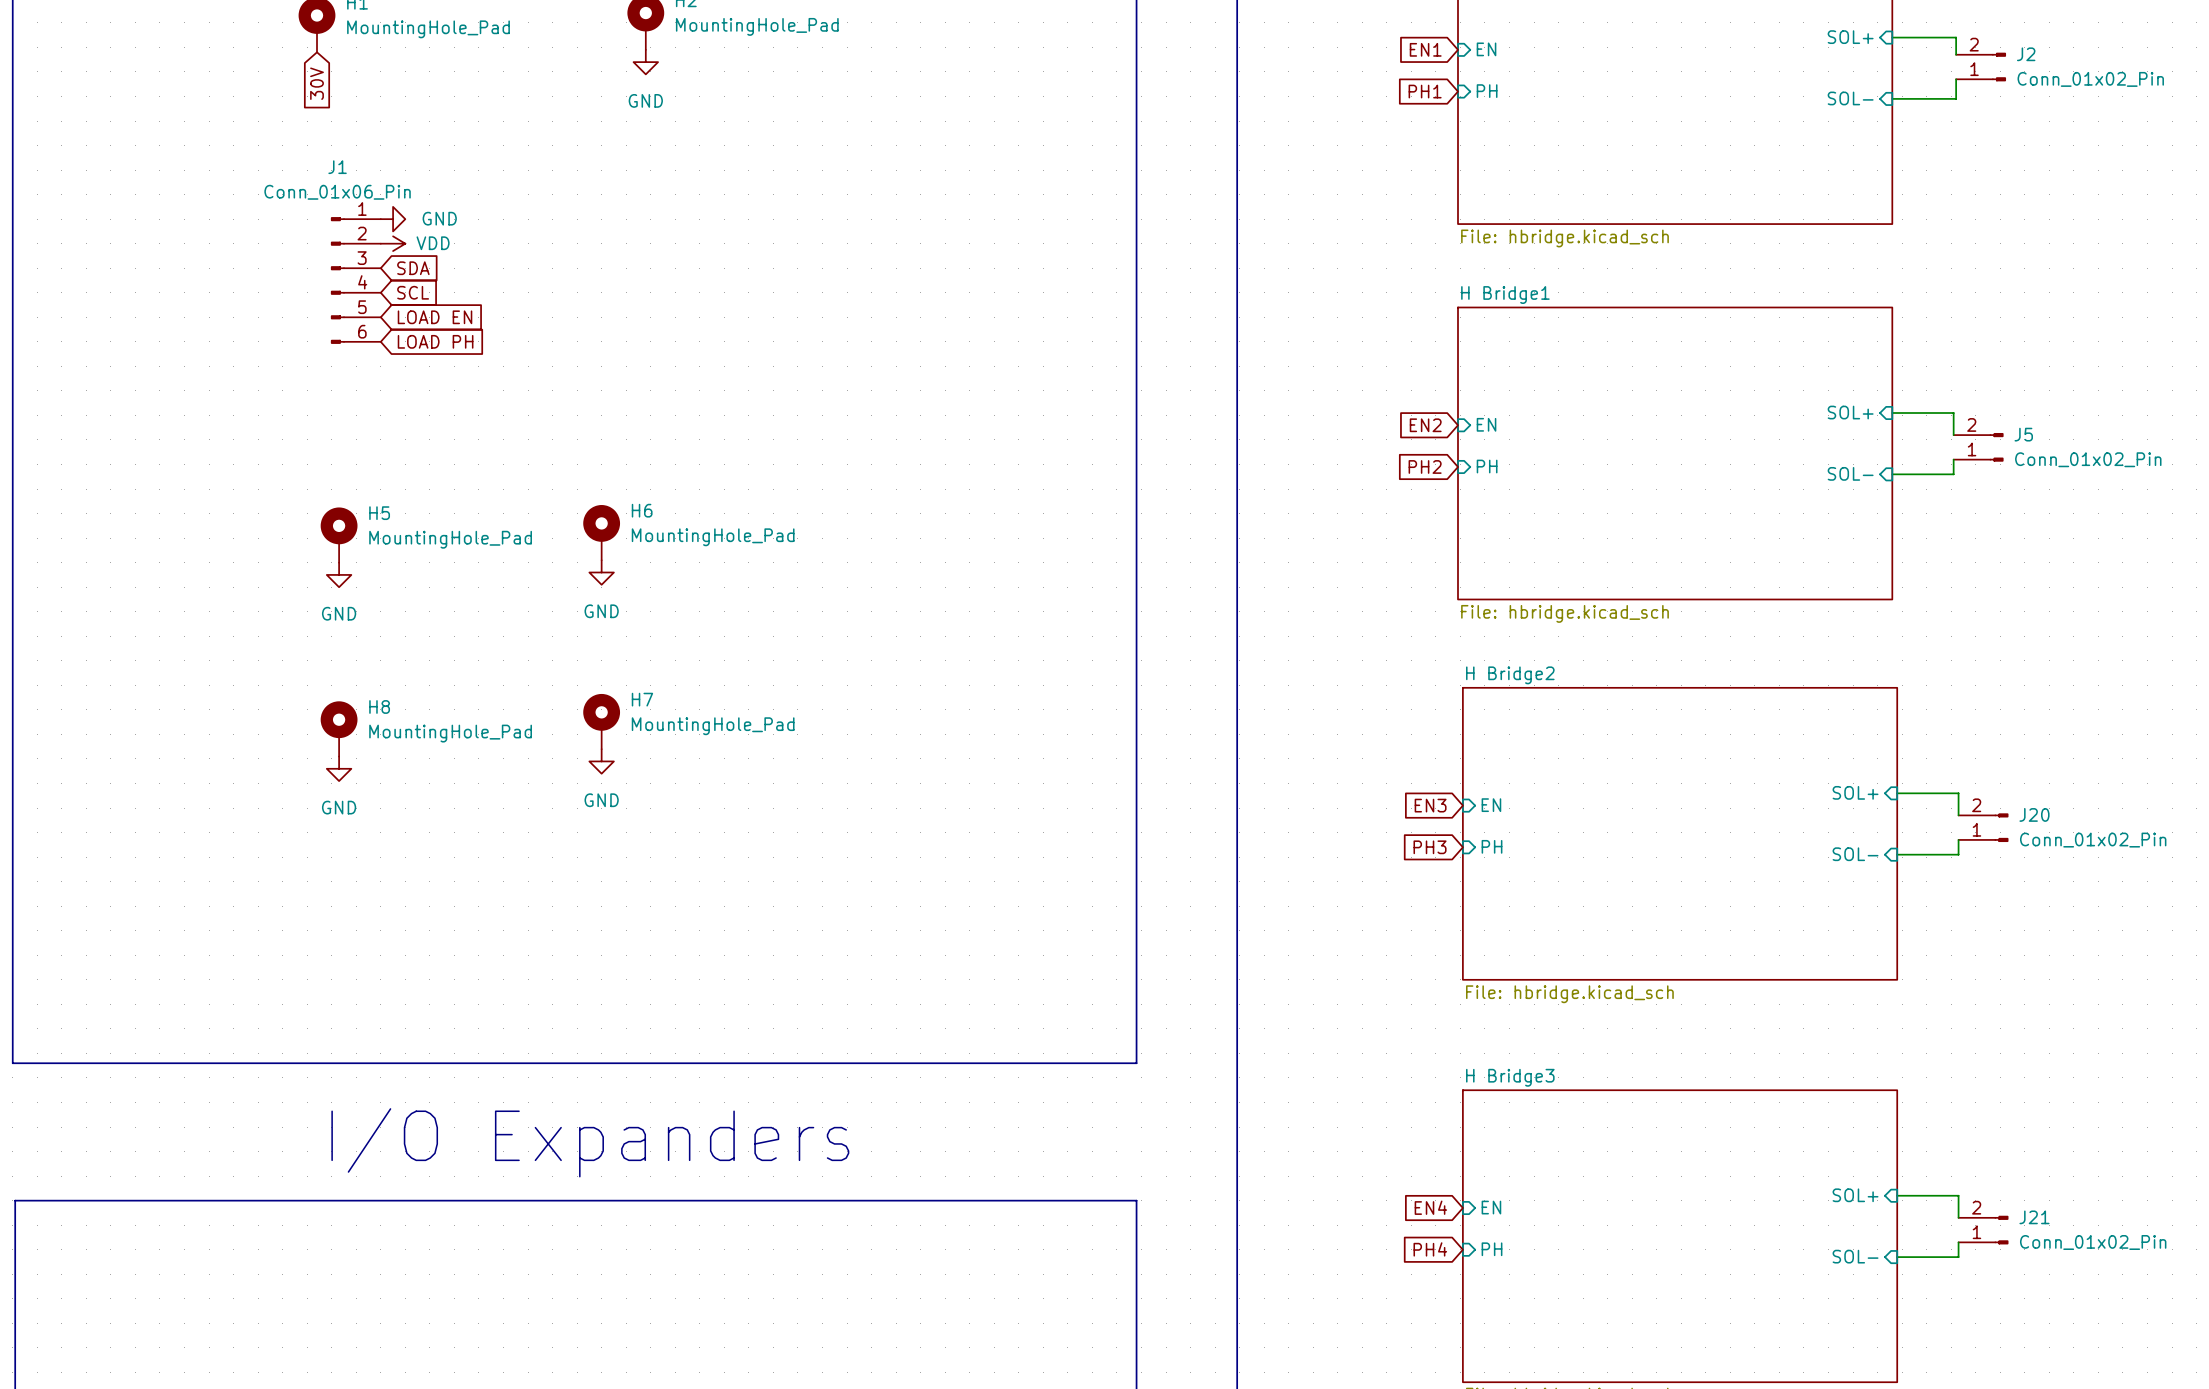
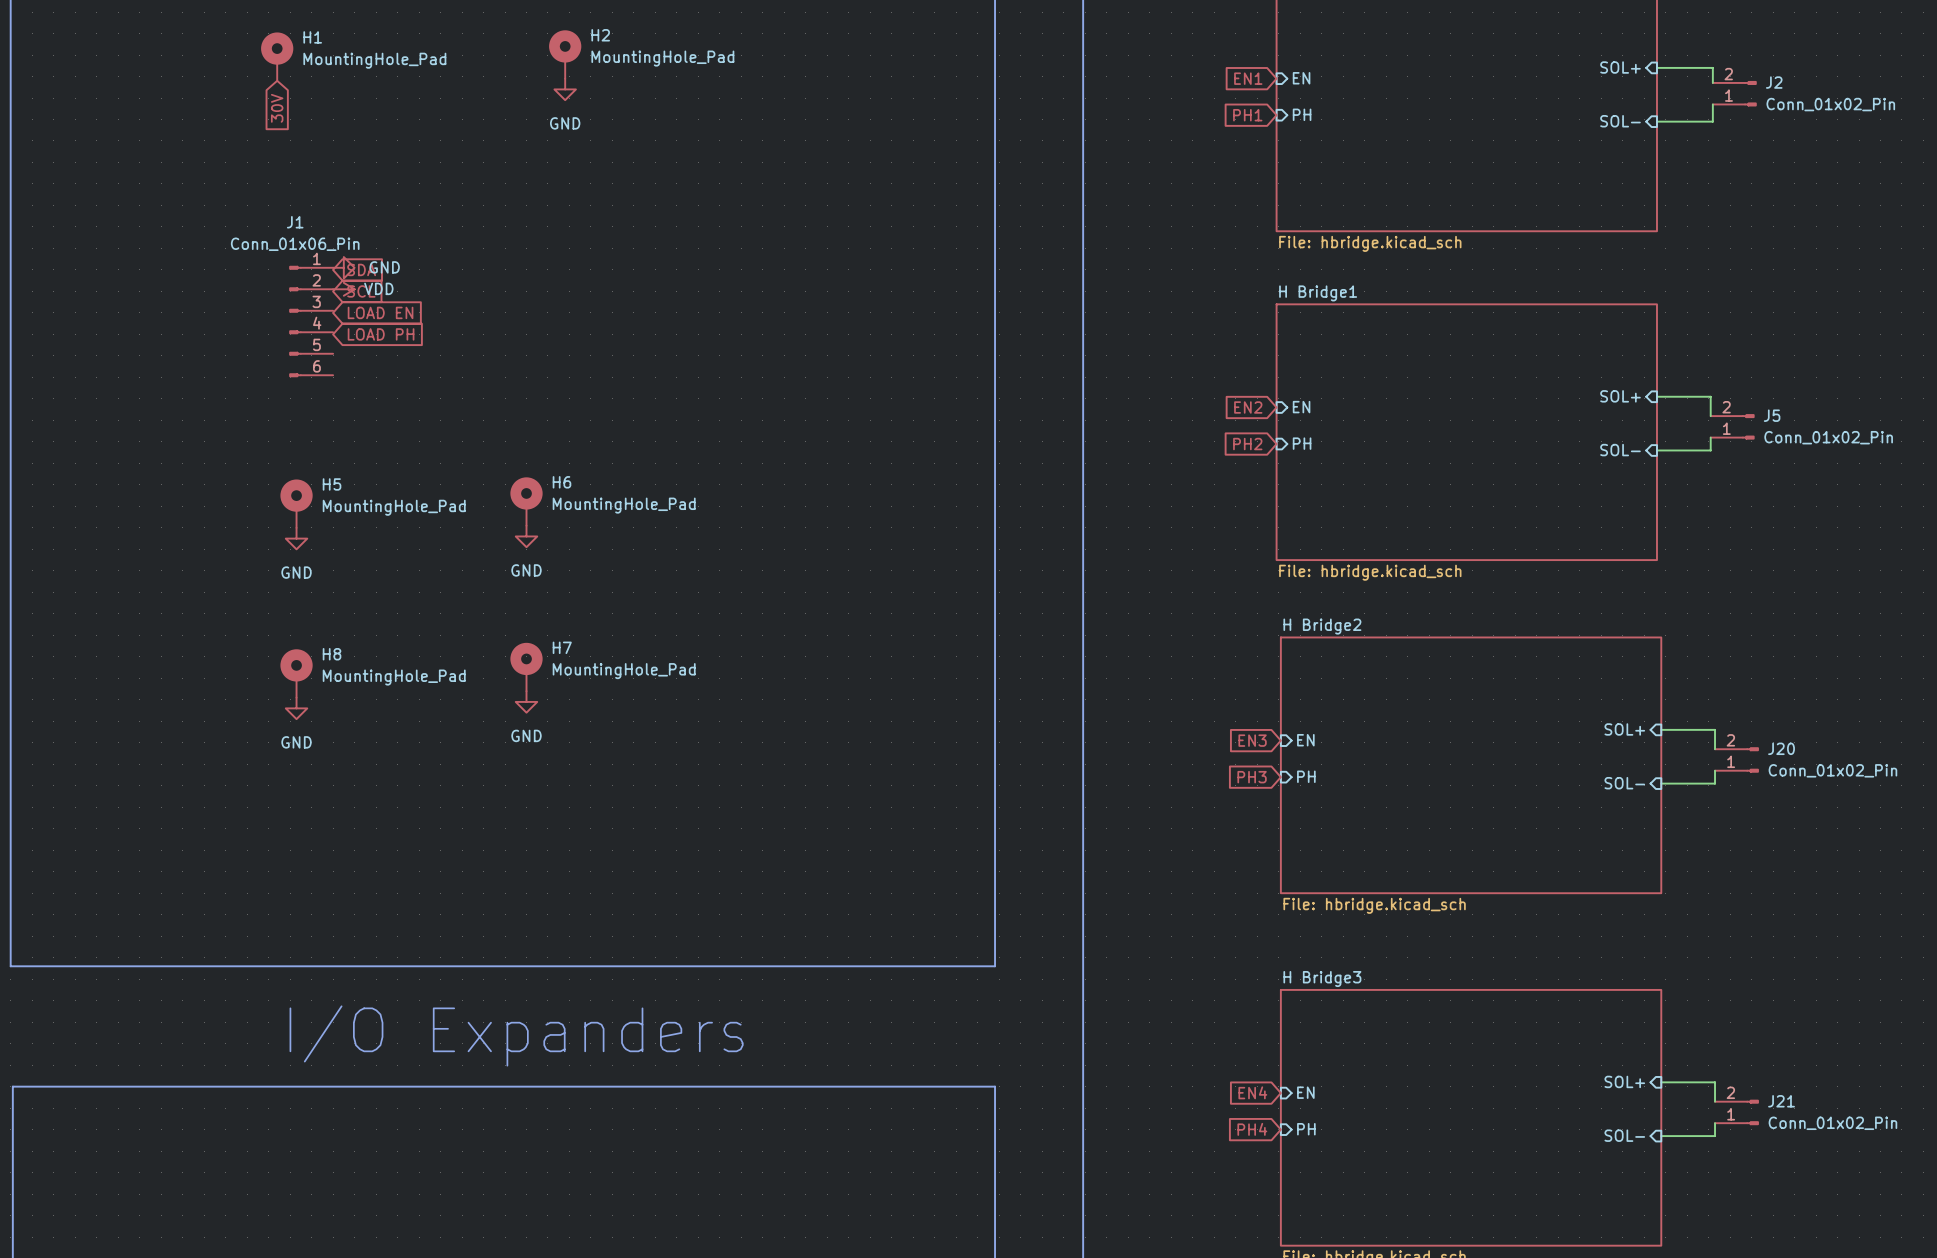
power symbol position: GND (393, 219) -> GND (343, 267)
power symbol position: VDD (393, 243) -> VDD (343, 289)
J1 position: (355, 280) -> (311, 321)

